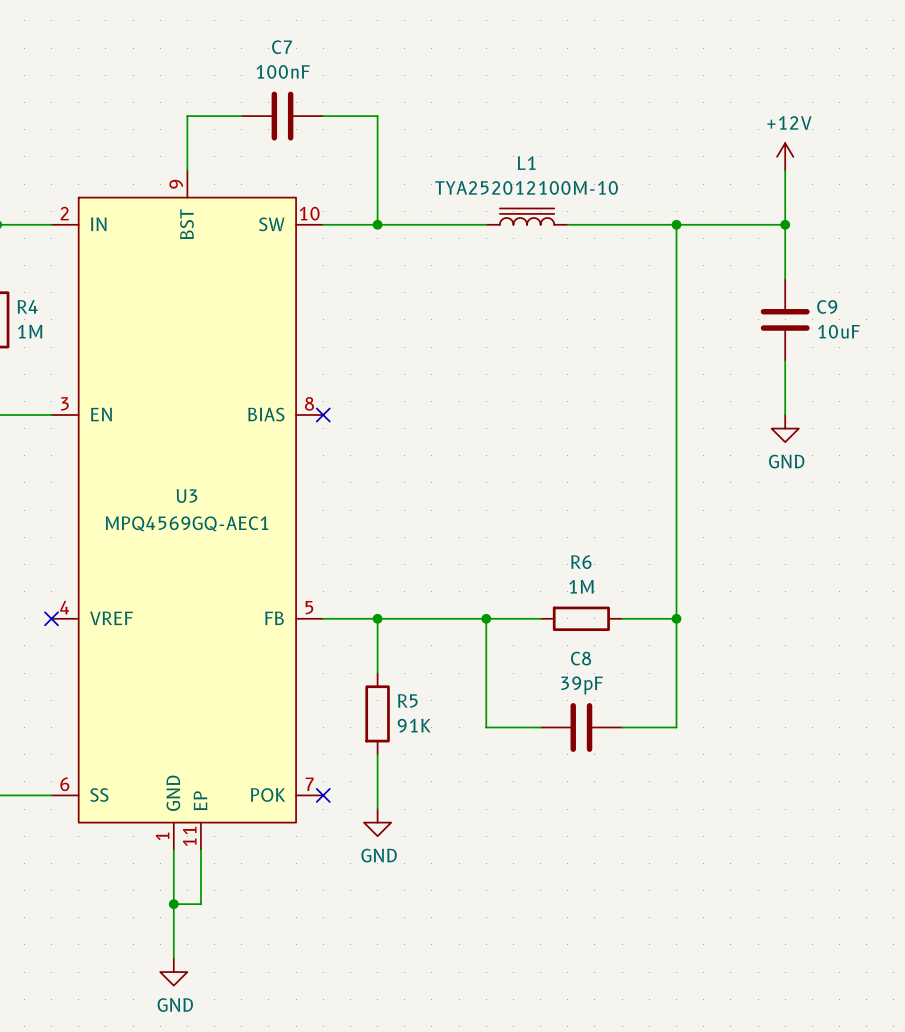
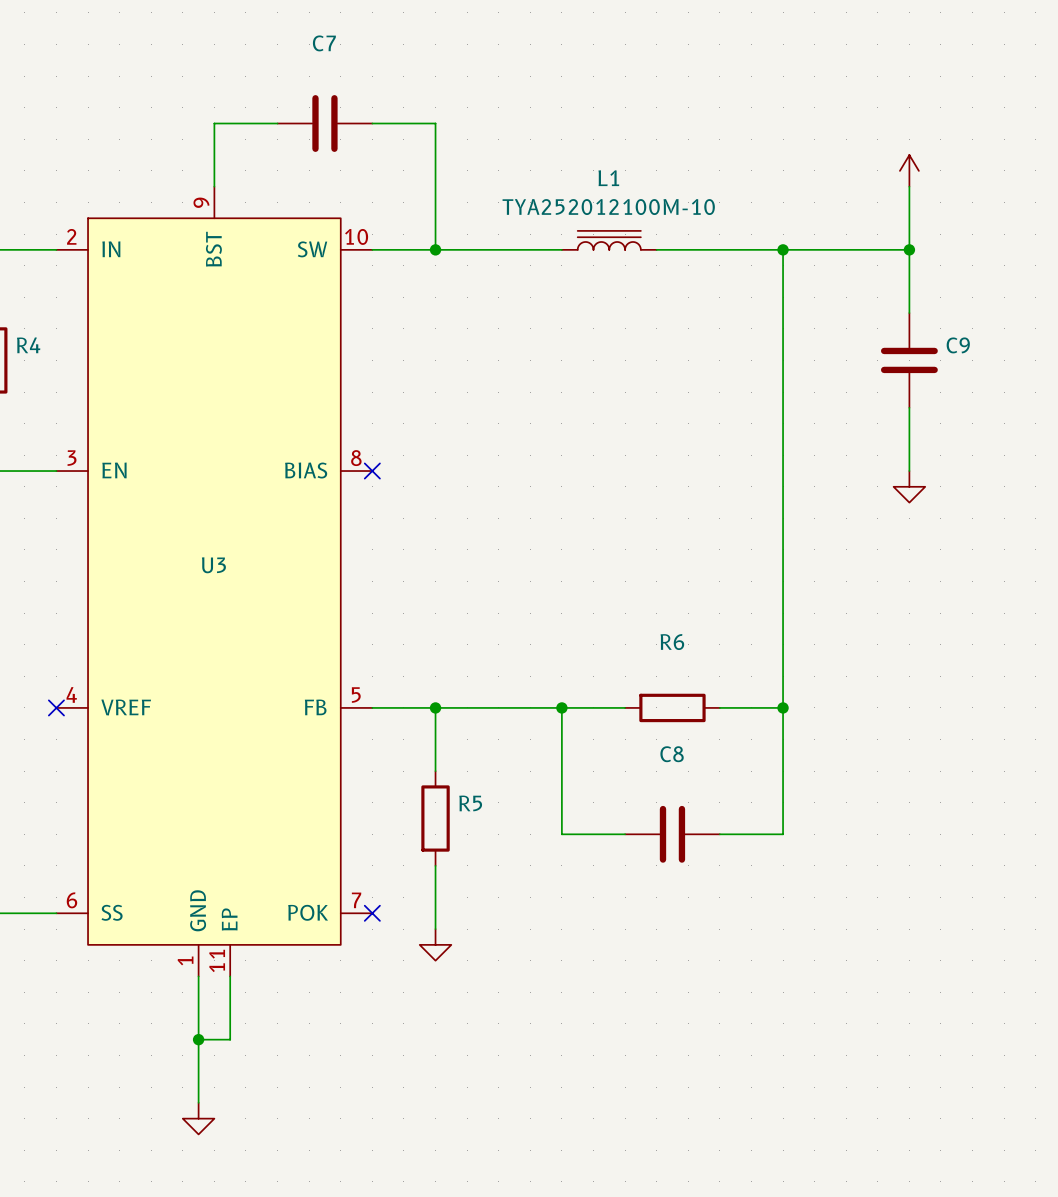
C7 value: 100nF (283, 71) -> none
power symbol text: +12V (789, 123) -> none
R4 value: 1M (30, 331) -> none
C9 value: 10uF (838, 331) -> none
power symbol text: GND (786, 461) -> none
U3 value: MPQ4569GQ-AEC1 (187, 523) -> none
R6 value: 1M (581, 586) -> none
C8 value: 39pF (582, 685) -> none
R5 value: 91K (414, 725) -> none
power symbol text: GND (379, 855) -> none
power symbol text: GND (175, 1005) -> none

